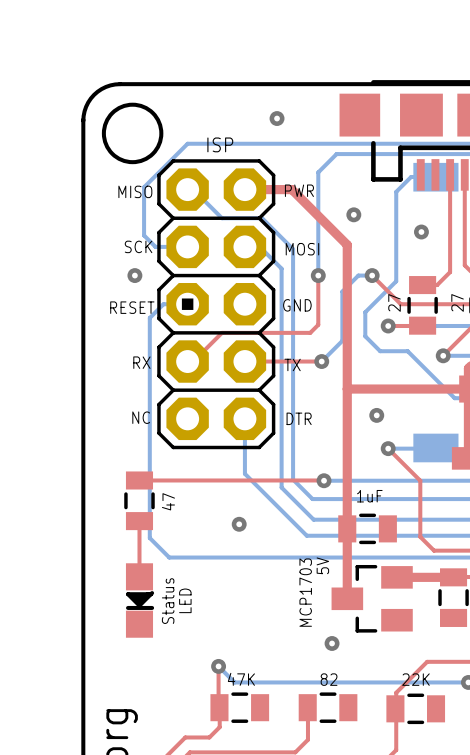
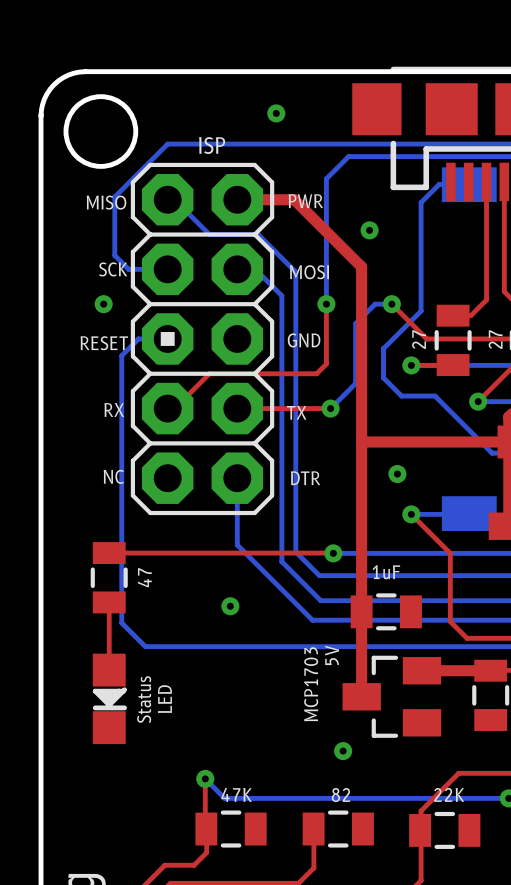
via: (421, 232) -> none

